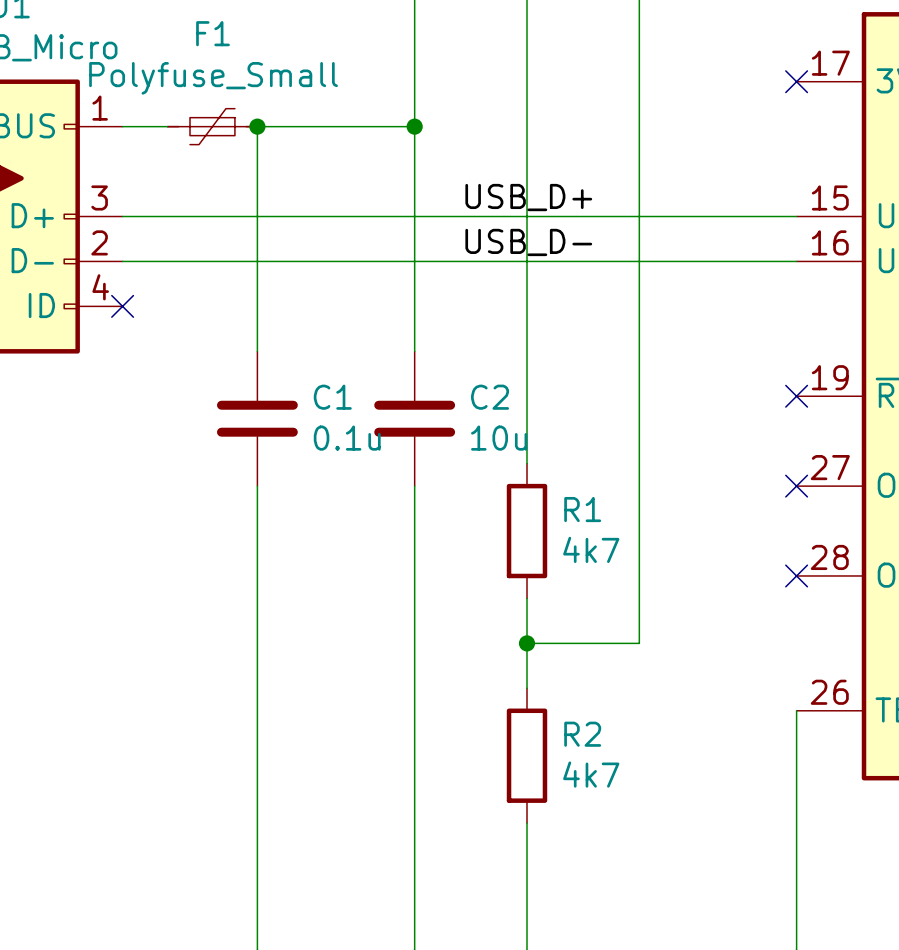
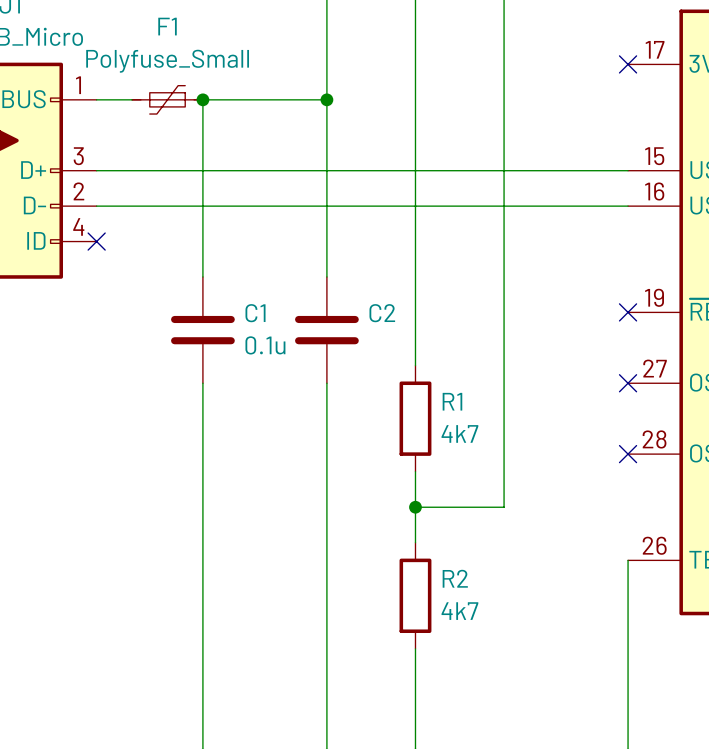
label: USB_D+ (528, 197) -> none
label: USB_D- (528, 242) -> none
C2 value: 10u (499, 438) -> none

